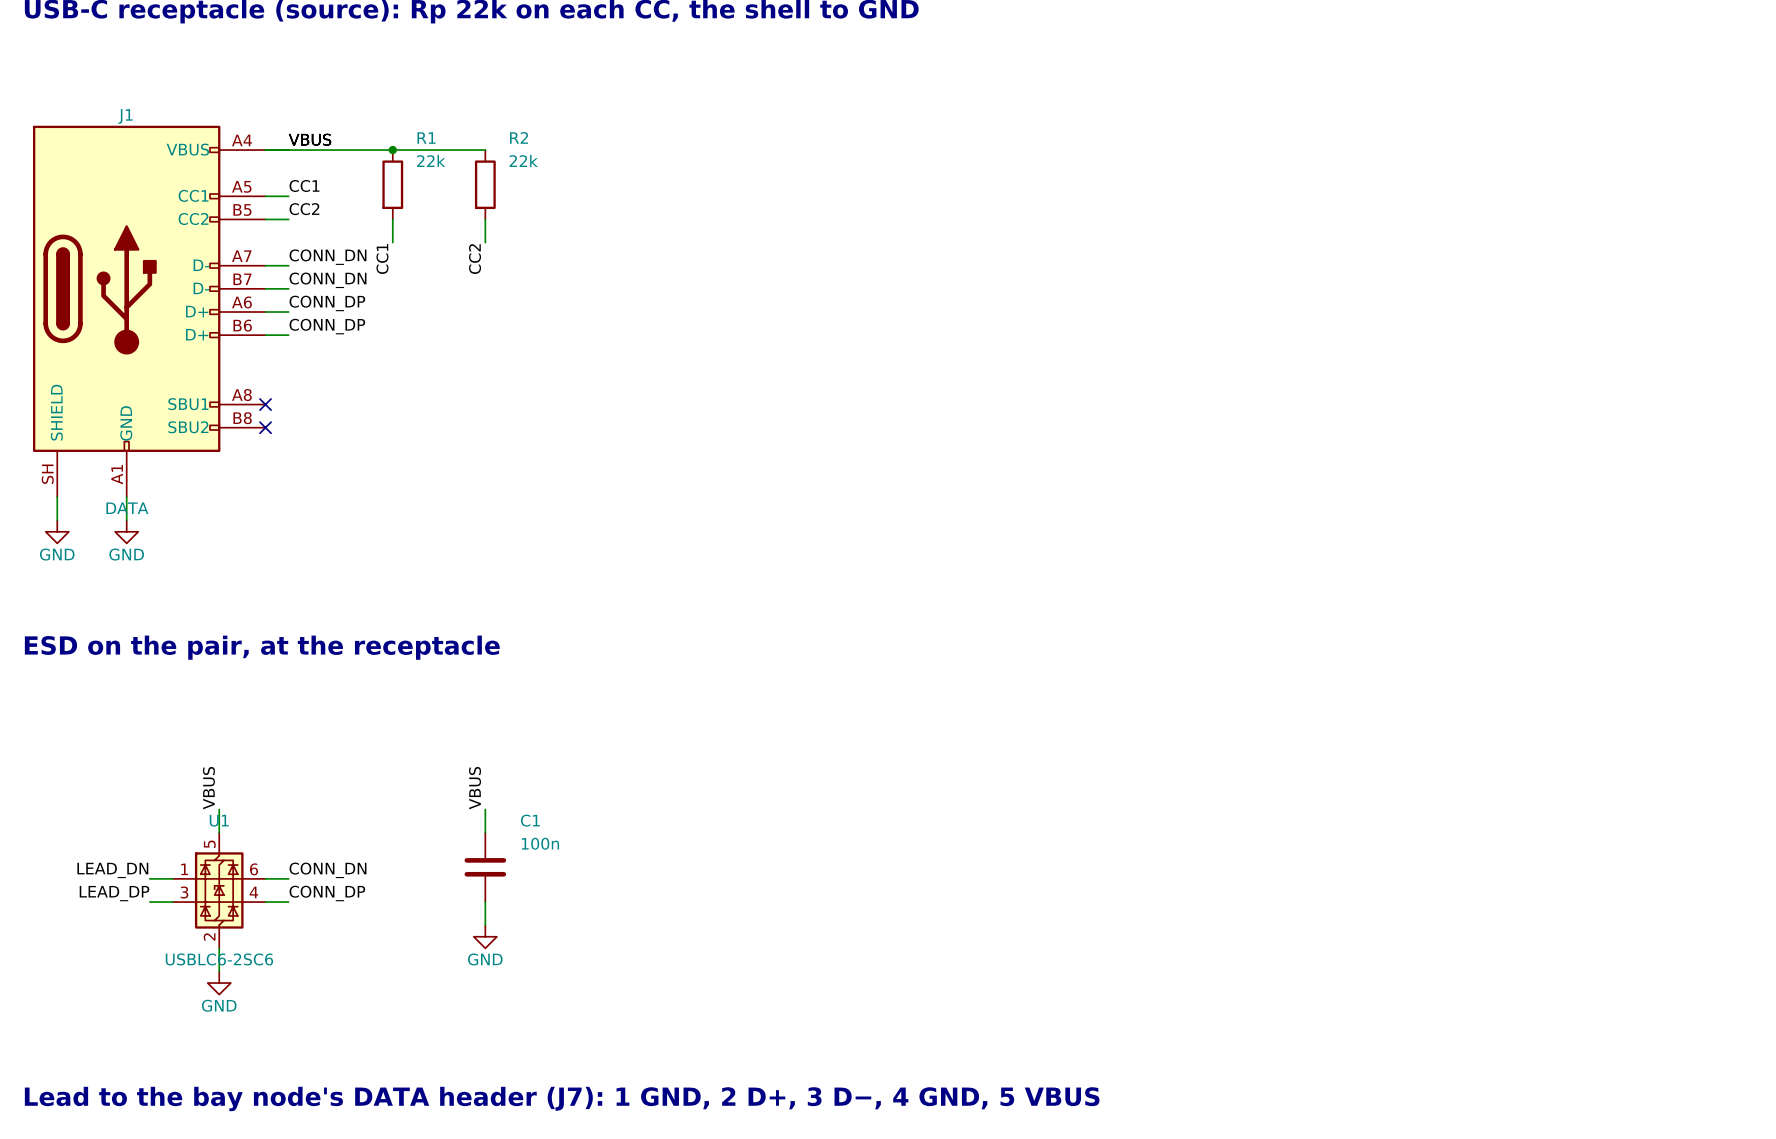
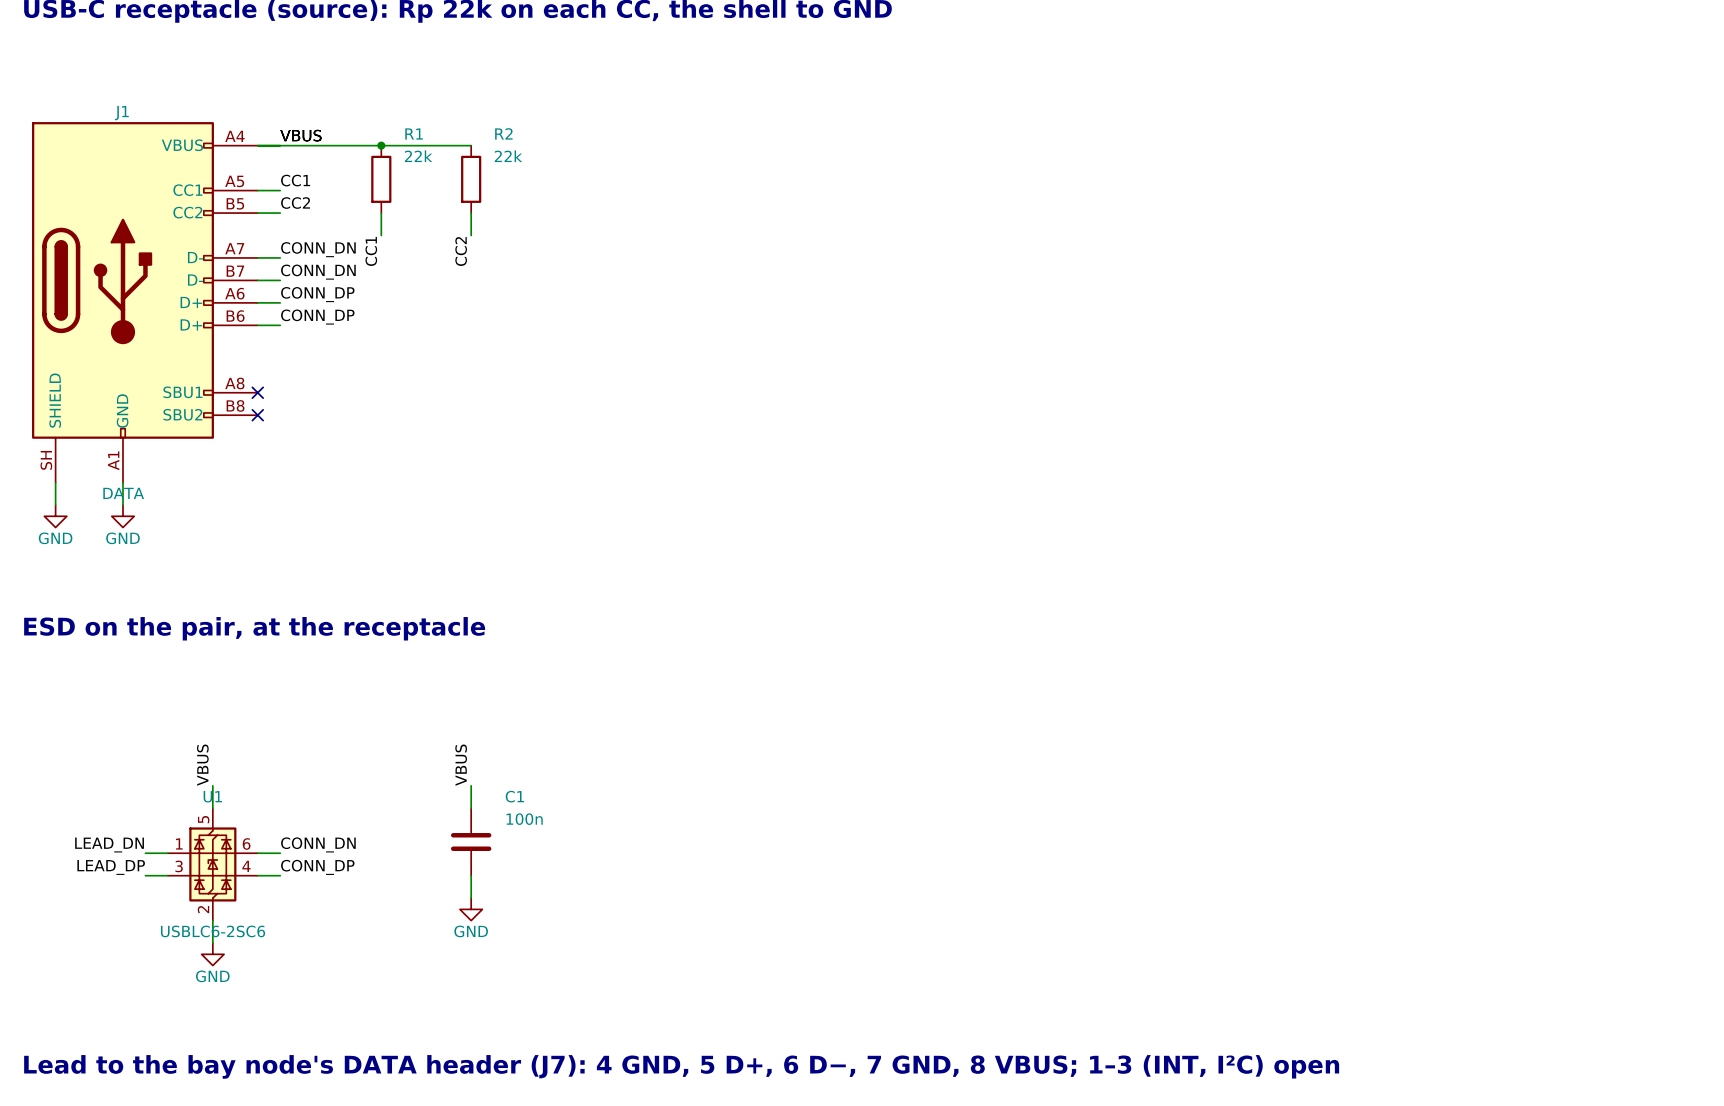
text: Lead to the bay node's DATA header (J7): 1 GND, 2 D+, 3 D−, 4 GND, 5 VBUS (562, 1098) -> Lead to the bay node's DATA header (J7): 4 GND, 5 D+, 6 D−, 7 GND, 8 VBUS; 1–3 (INT, I²C) open (681, 1066)

